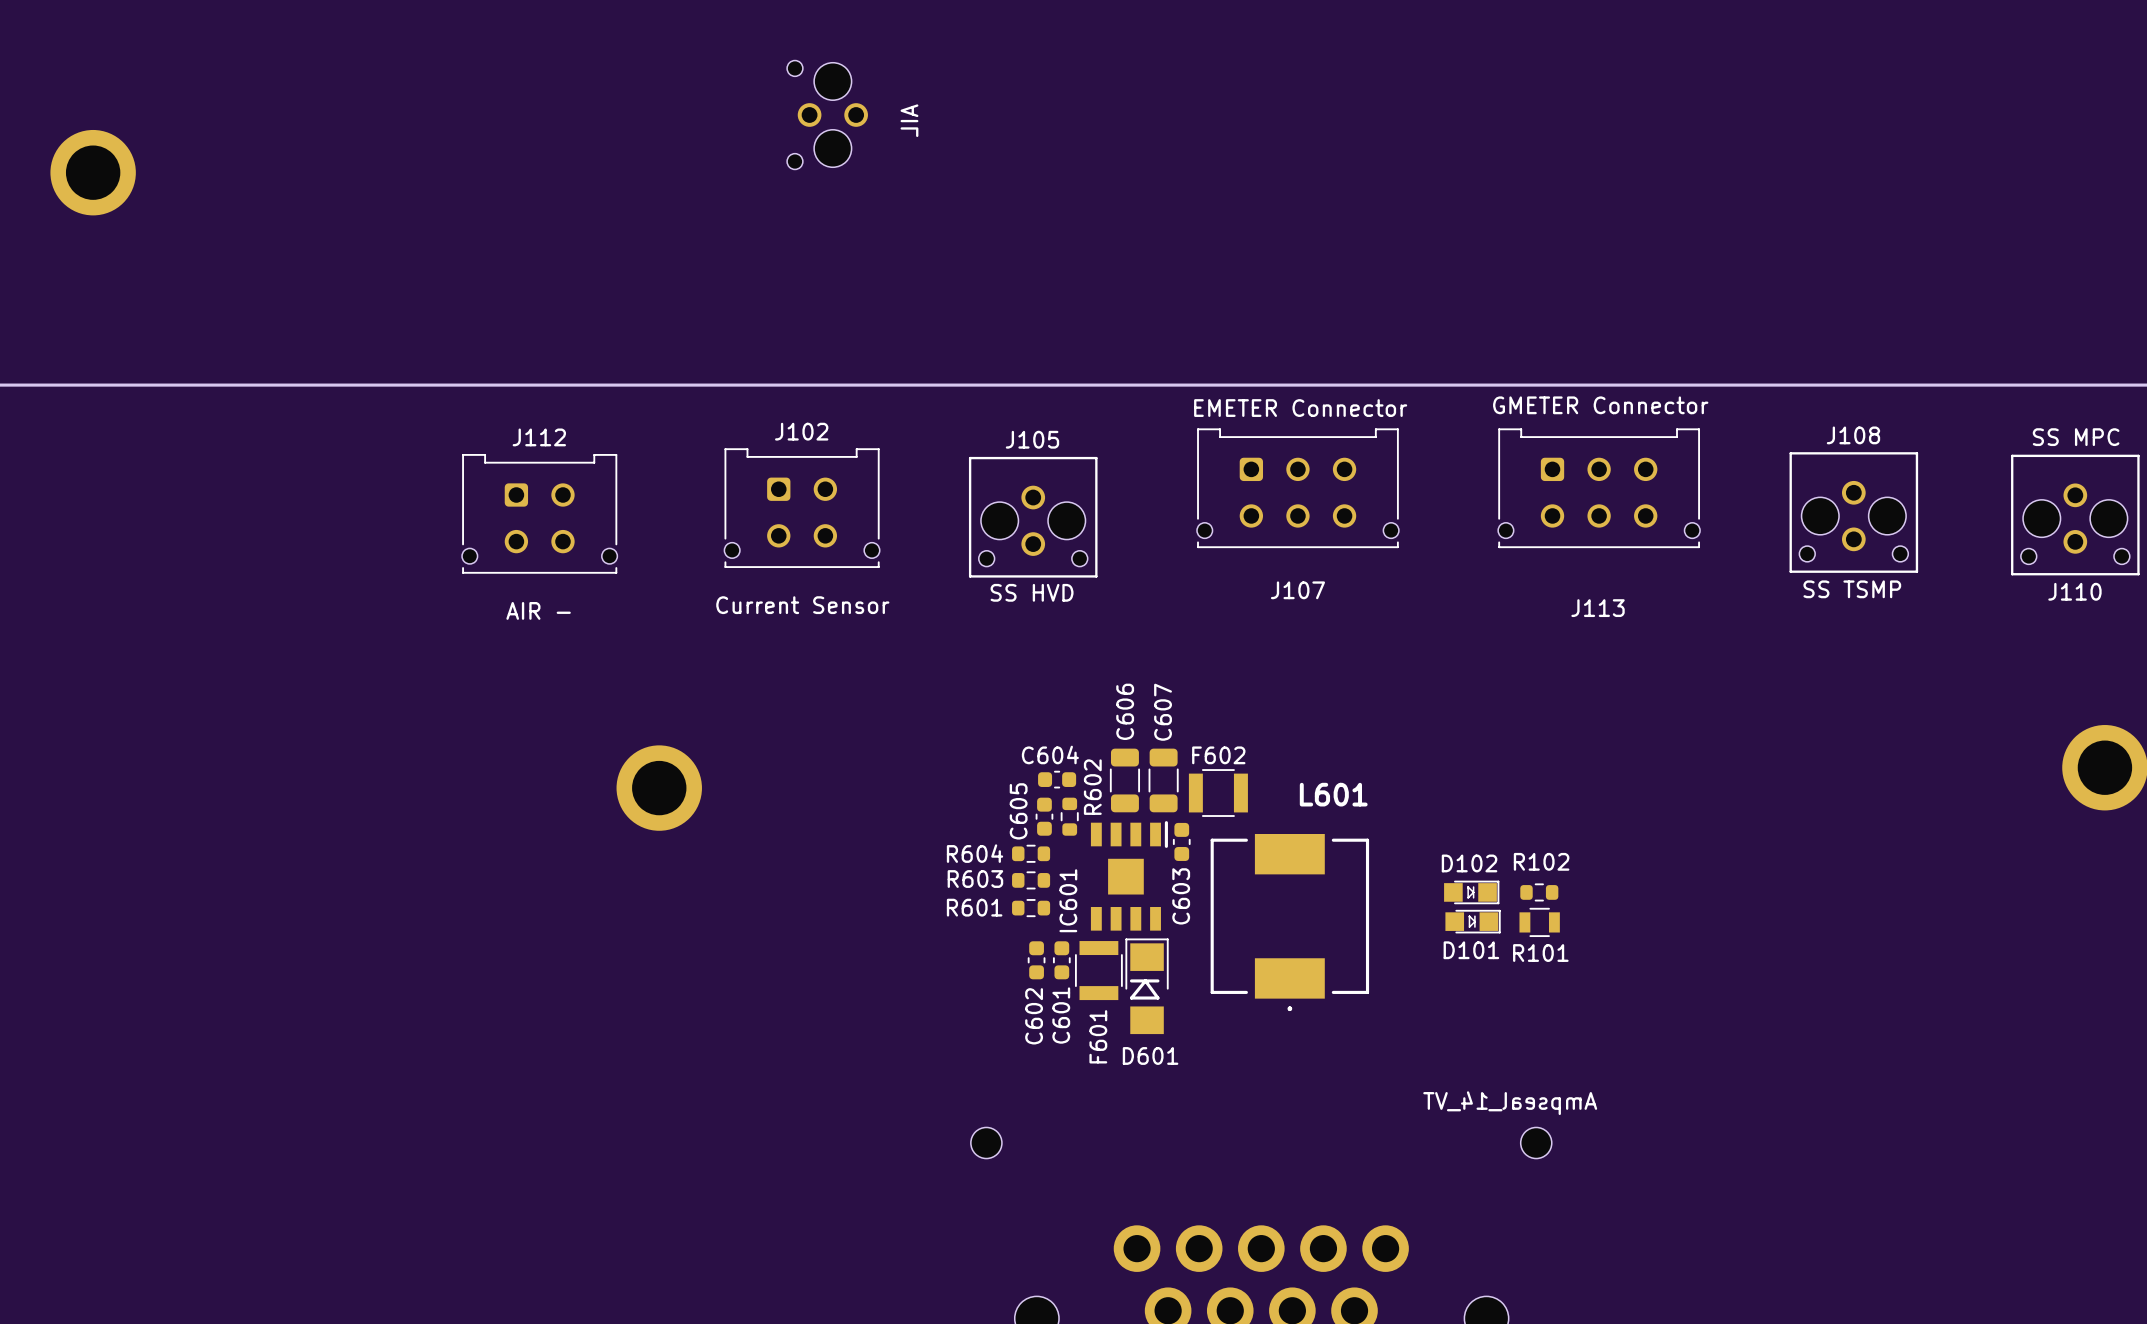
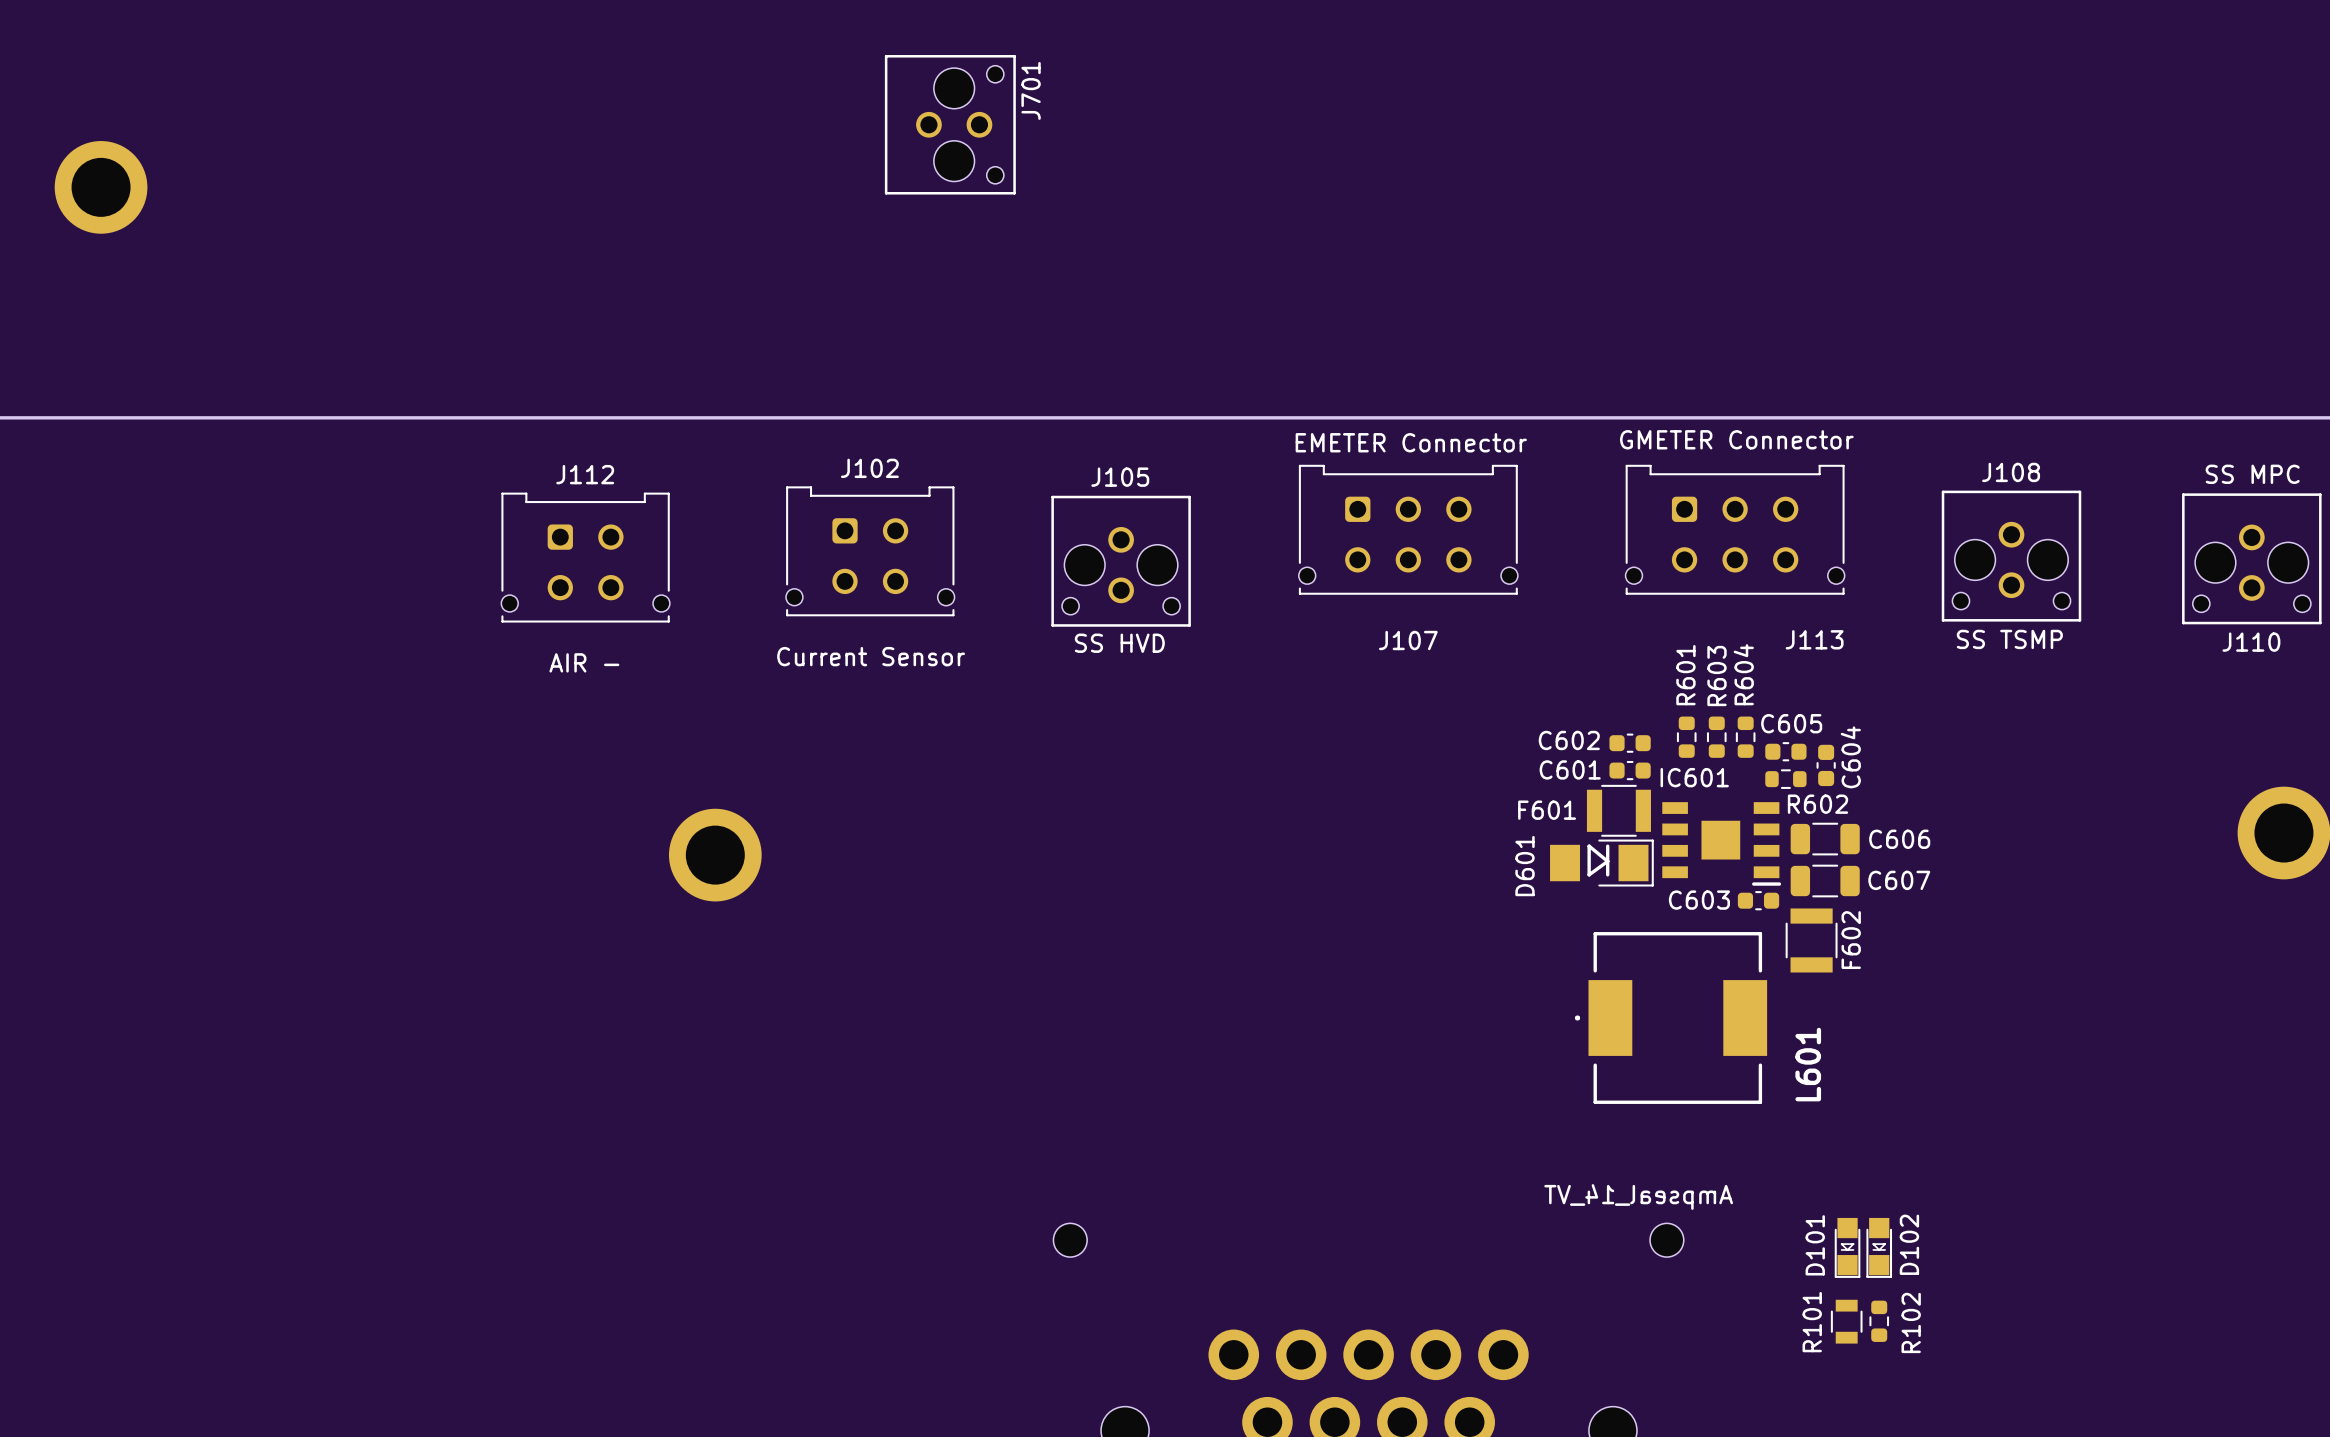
J701 side: bottom (827, 114) -> top (950, 124)
J113 name position: J113 (1598, 608) -> J113 (1814, 639)
C604 rotation: 0° (1057, 779) -> 90° clockwise (1826, 765)
C604 position: (1057, 779) -> (1826, 765)
C606 rotation: 0° (1124, 780) -> 90° clockwise (1825, 839)
C606 position: (1124, 780) -> (1825, 839)
C607 rotation: 0° (1163, 780) -> 90° clockwise (1825, 881)
C607 position: (1163, 780) -> (1825, 881)
F602 rotation: 0° (1218, 793) -> 90° clockwise (1811, 940)
F602 position: (1218, 793) -> (1811, 940)
C605 rotation: 0° (1044, 816) -> 90° clockwise (1785, 751)
C605 position: (1044, 816) -> (1785, 751)
R602 rotation: 0° (1069, 816) -> 90° clockwise (1785, 779)
R602 position: (1069, 816) -> (1785, 779)
C603 rotation: 0° (1181, 841) -> 90° clockwise (1758, 900)
C603 position: (1181, 841) -> (1758, 900)
R604 rotation: 0° (1031, 853) -> 90° clockwise (1745, 737)
R604 position: (1031, 853) -> (1745, 737)
IC601 rotation: 0° (1129, 875) -> 90° clockwise (1721, 843)
IC601 position: (1129, 875) -> (1721, 843)
R603 rotation: 0° (1031, 880) -> 90° clockwise (1716, 737)
R603 position: (1031, 880) -> (1716, 737)
D102 rotation: 0° (1471, 892) -> 90° clockwise (1879, 1247)
D102 position: (1471, 892) -> (1879, 1247)
R102 rotation: 0° (1539, 892) -> 90° clockwise (1879, 1321)
R102 position: (1539, 892) -> (1879, 1321)
R601 rotation: 0° (1031, 908) -> 90° clockwise (1686, 737)
R601 position: (1031, 908) -> (1686, 737)
D101 rotation: 0° (1473, 921) -> 90° clockwise (1847, 1247)
D101 position: (1473, 921) -> (1847, 1247)
L601 rotation: 0° (1289, 922) -> 90° clockwise (1671, 1017)
L601 position: (1289, 922) -> (1671, 1017)
R101 rotation: 0° (1539, 922) -> 90° clockwise (1846, 1321)
R101 position: (1539, 922) -> (1846, 1321)
C602 rotation: 0° (1036, 960) -> 90° clockwise (1630, 743)
C602 position: (1036, 960) -> (1630, 743)
C601 rotation: 0° (1061, 960) -> 90° clockwise (1630, 770)
C601 position: (1061, 960) -> (1630, 770)
F601 rotation: 0° (1098, 970) -> 90° clockwise (1618, 810)
F601 position: (1098, 970) -> (1618, 810)
D601 rotation: 0° (1147, 986) -> 90° clockwise (1601, 863)
D601 position: (1147, 986) -> (1601, 863)

